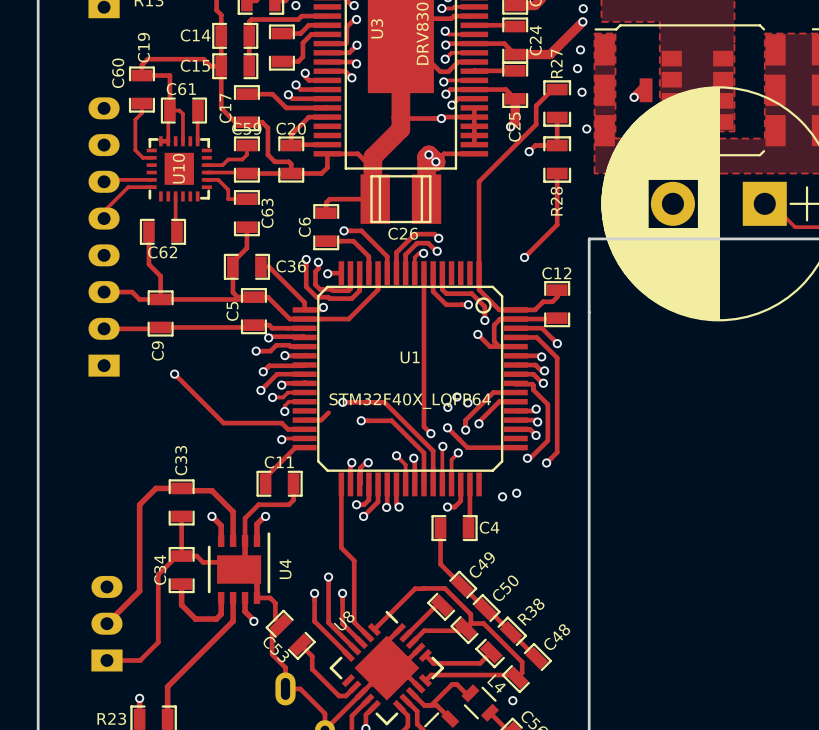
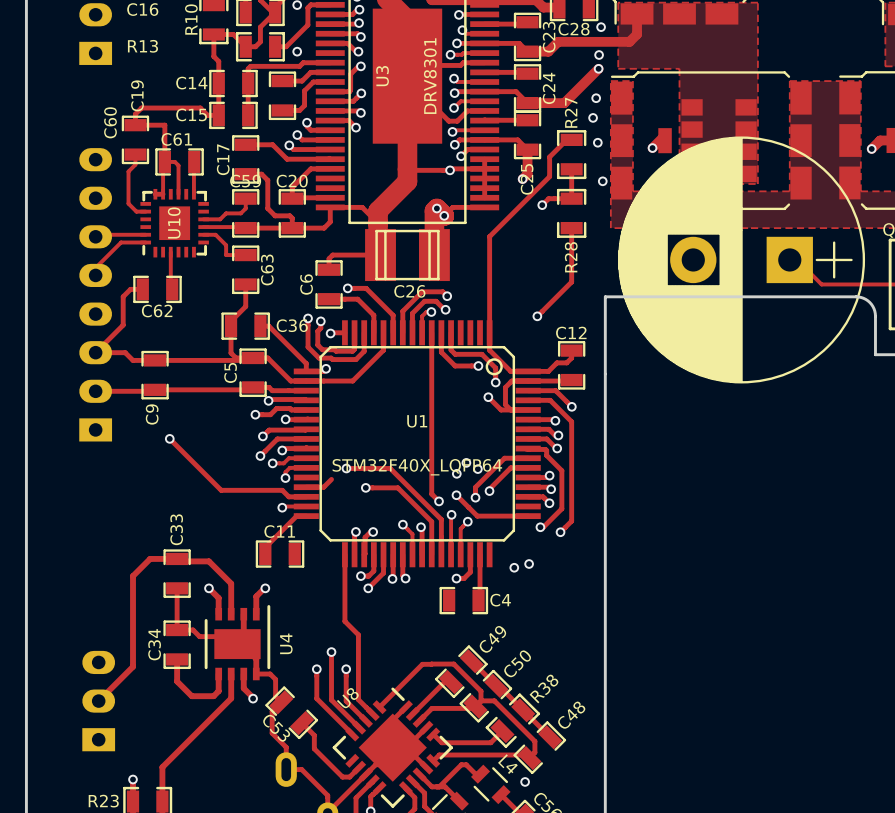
track: (221, 66) (221, 108) (235, 122) (246, 122) -> none
track: (148, 231) (148, 264) (160, 276) (160, 299) -> (142, 289) (130, 289) (123, 296) (123, 325) (95, 352)
track: (293, 483) (293, 500) (288, 504) (258, 504) (245, 518) (245, 541) -> none
track: (440, 528) (440, 564) (462, 585) -> none
track: (181, 556) (176, 556) (158, 574) (158, 642) (140, 660) (106, 660) -> none

